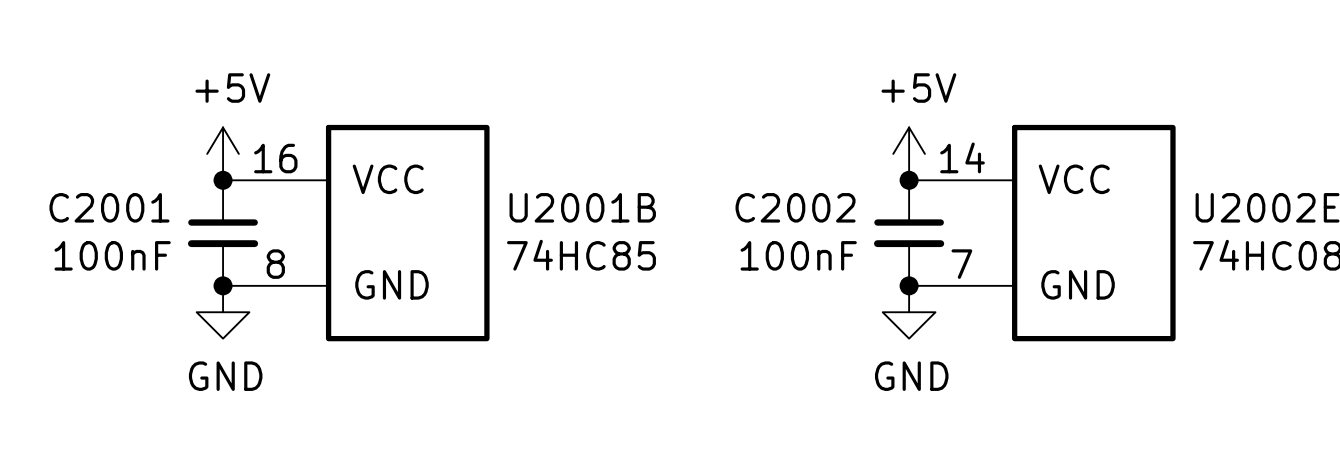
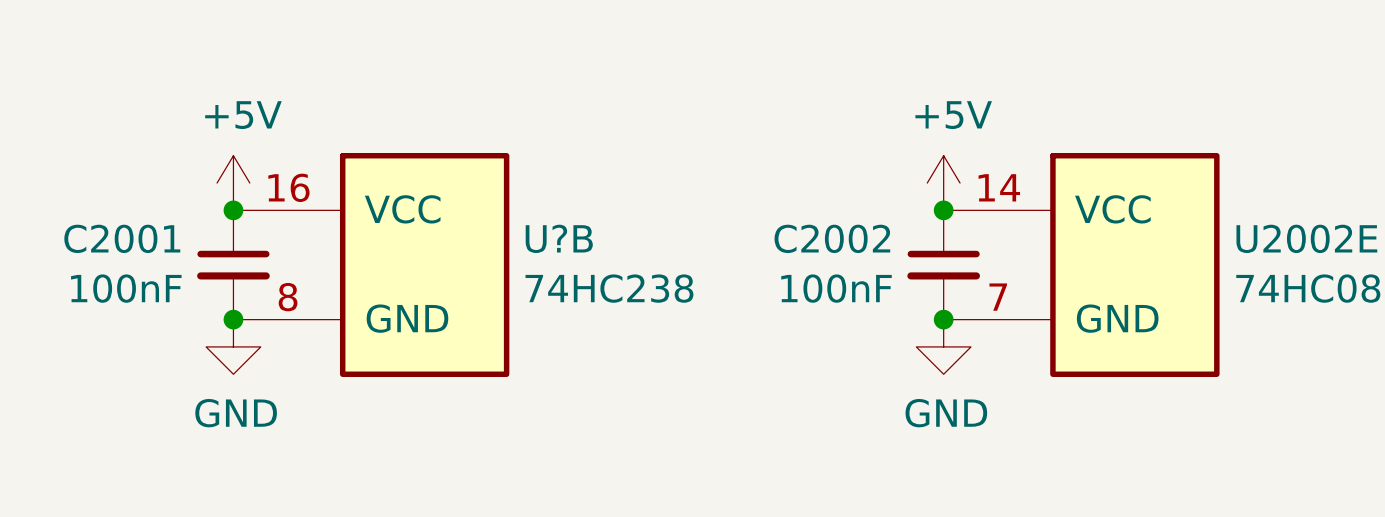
U2001B name: U2001B (582, 207) -> U?B (559, 238)
U2001B value: 74HC85 (581, 255) -> 74HC238 (609, 288)

